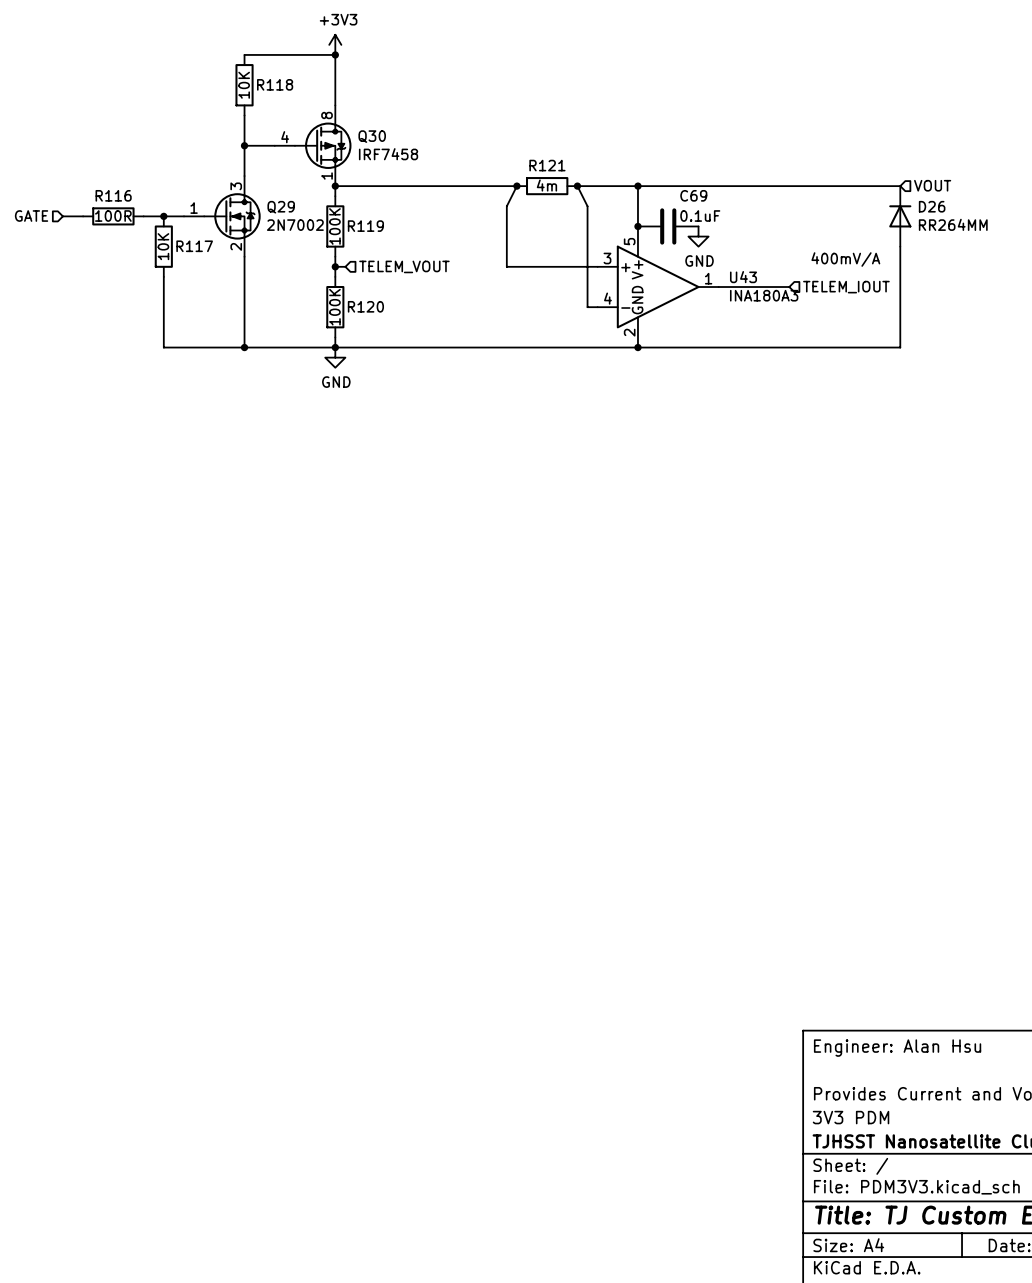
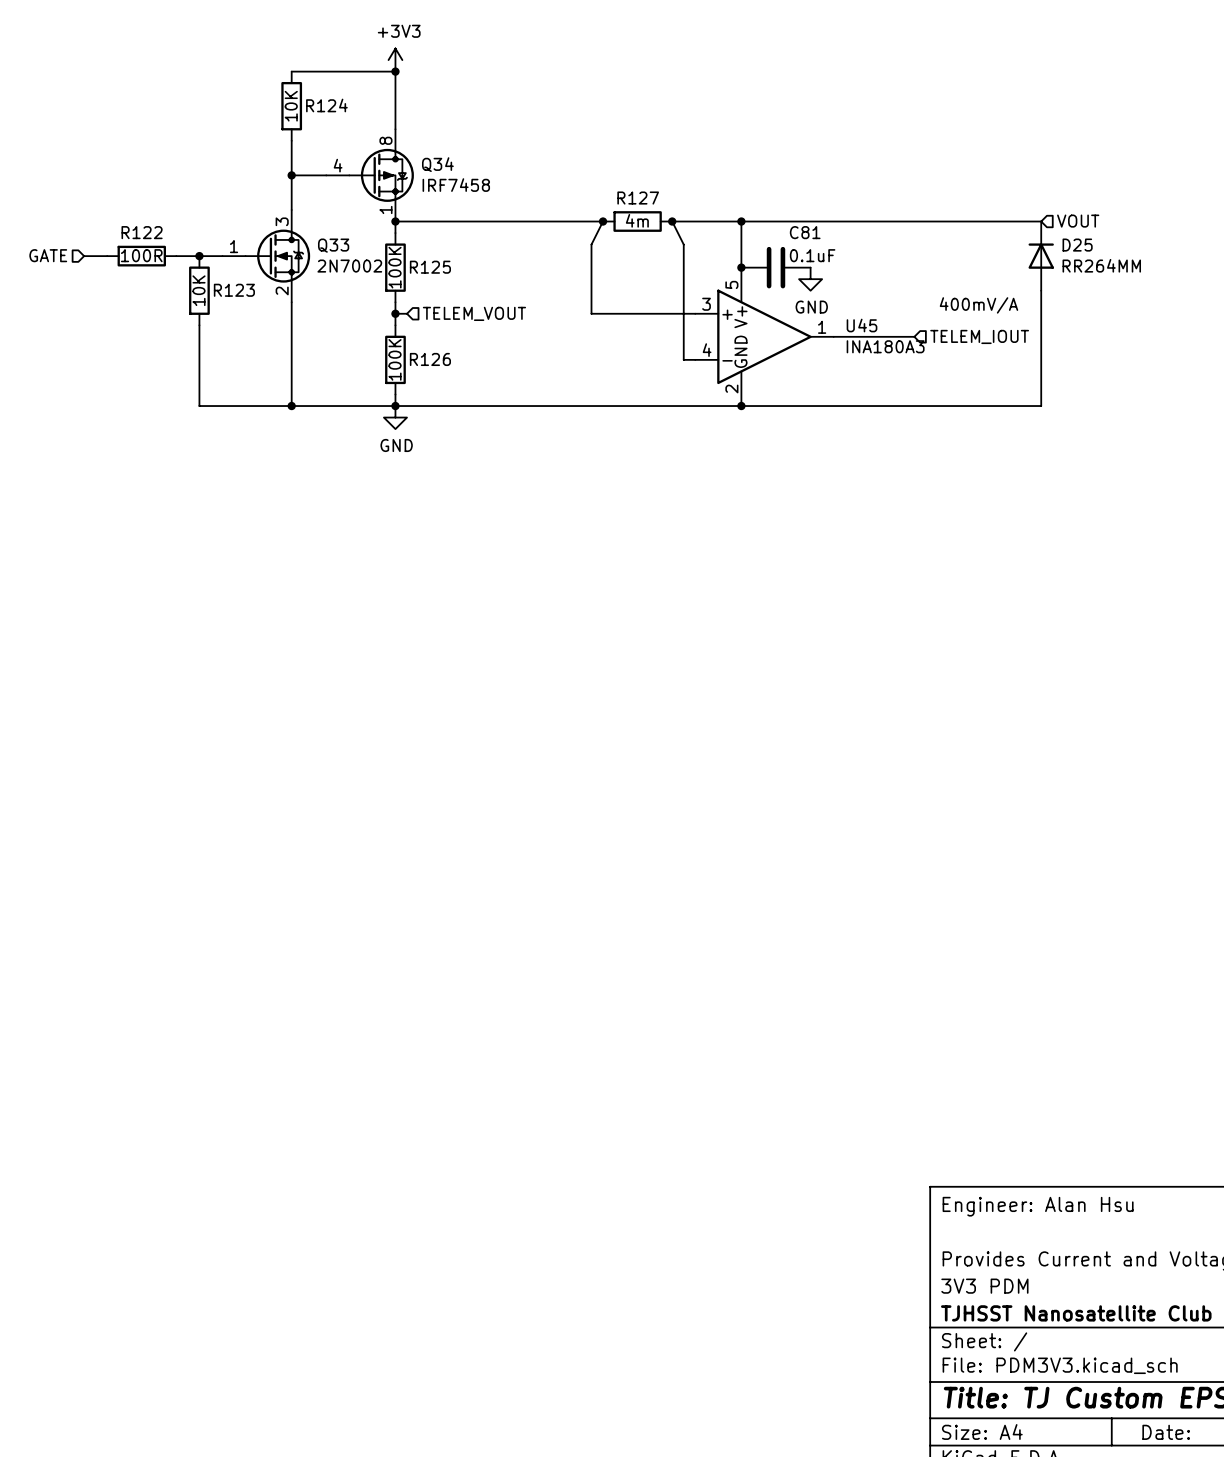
R118 name: R118 (275, 84) -> R124 (326, 105)
Q30 name: Q30 (372, 136) -> Q34 (437, 164)
R121 name: R121 (547, 165) -> R127 (638, 198)
R116 name: R116 (113, 195) -> R122 (142, 232)
C69 name: C69 (693, 195) -> C81 (805, 232)
D26 name: D26 (932, 206) -> D25 (1077, 245)
Q29 name: Q29 (281, 207) -> Q33 (333, 245)
R119 name: R119 (365, 226) -> R125 (430, 267)
R117 name: R117 (194, 246) -> R123 (234, 290)
U43 name: U43 (743, 277) -> U45 (862, 325)
R120 name: R120 (365, 306) -> R126 (430, 359)

